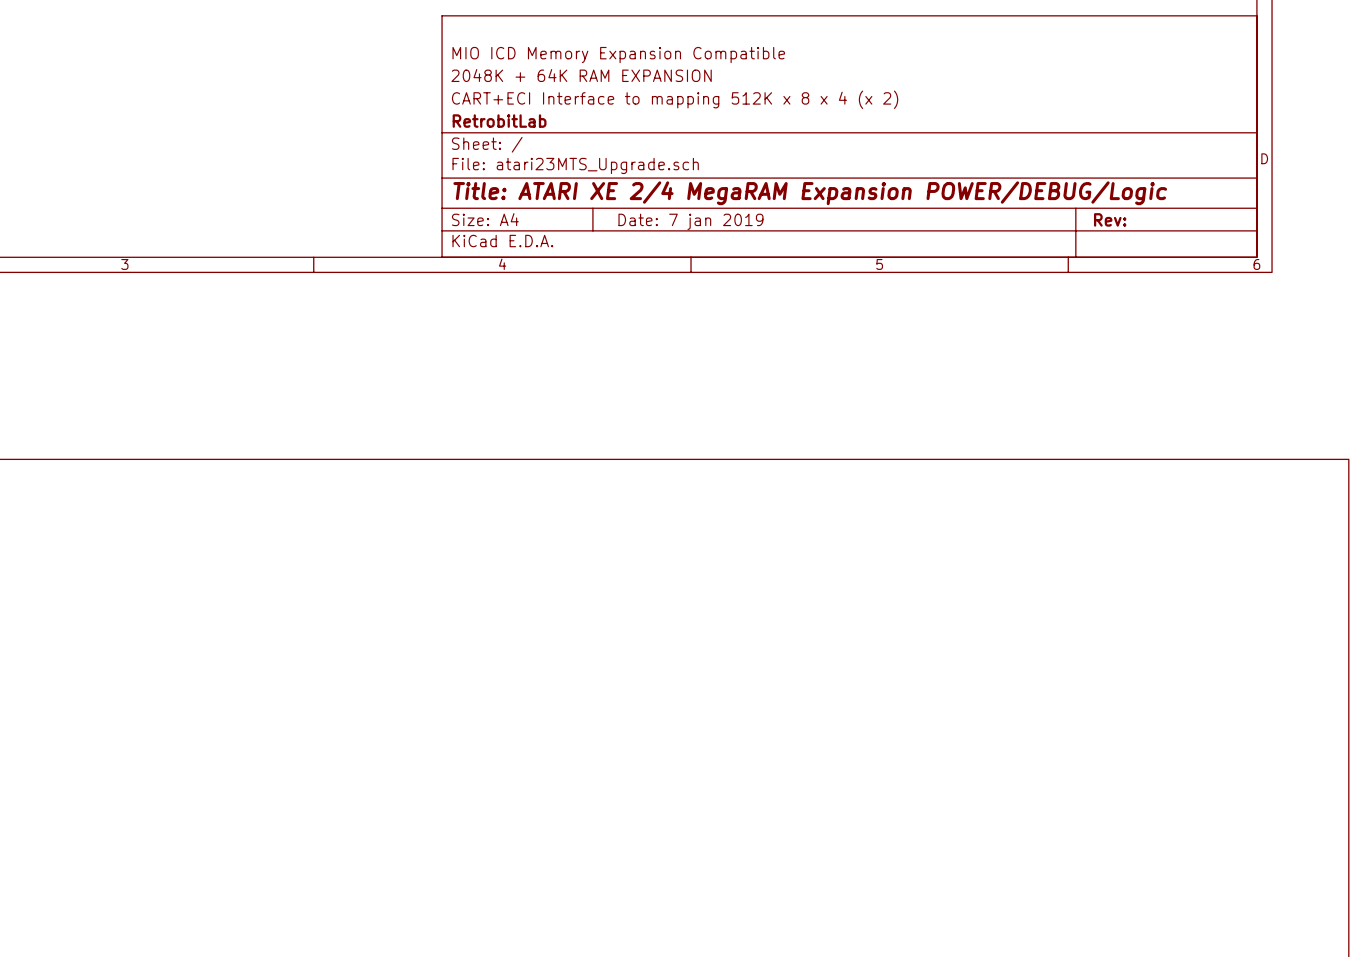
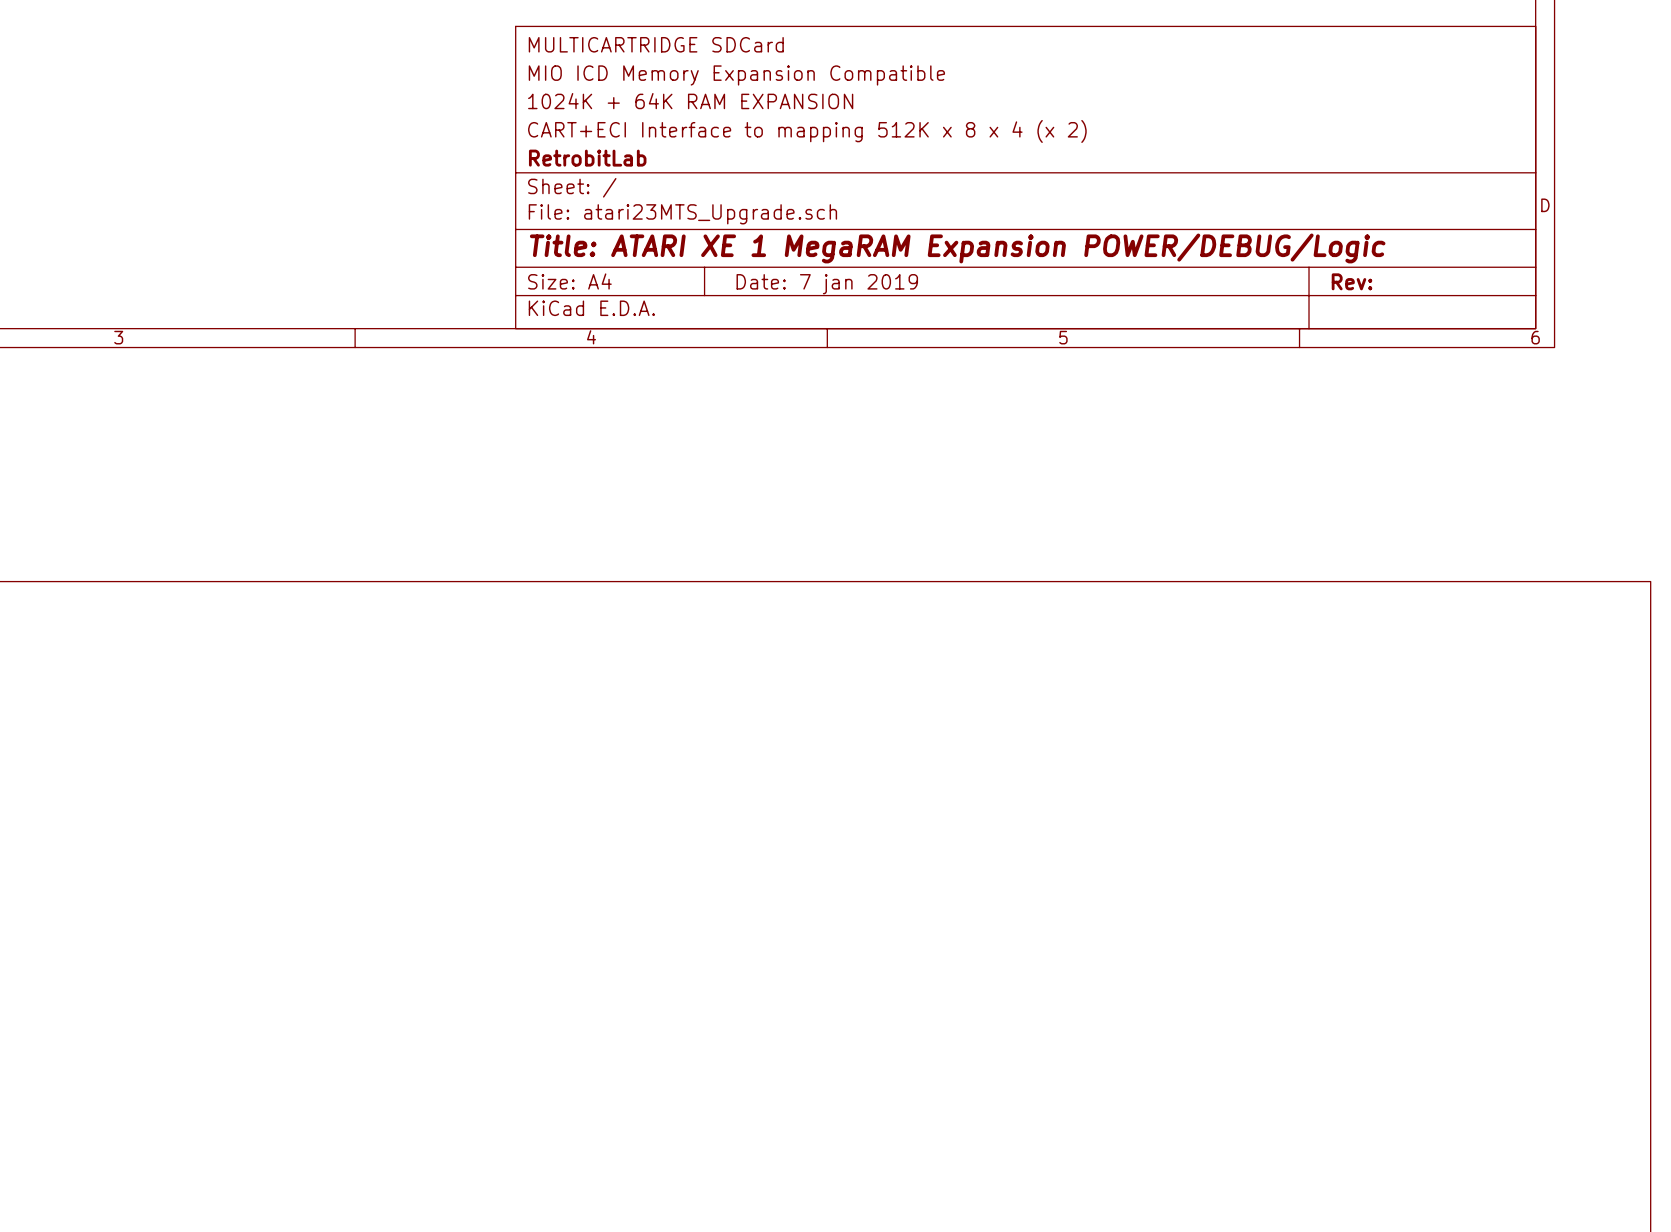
title block: none -> MULTICARTRIDGE SDCard (656, 44)
title block: 2048K + 64K RAM EXPANSION (581, 75) -> 1024K + 64K RAM EXPANSION (690, 101)
title block: Title: ATARI XE 2/4 MegaRAM Expansion POWER/DEBUG/Logic (810, 193) -> Title: ATARI XE 1 MegaRAM Expansion POWER/DEBUG/Logic (957, 248)

